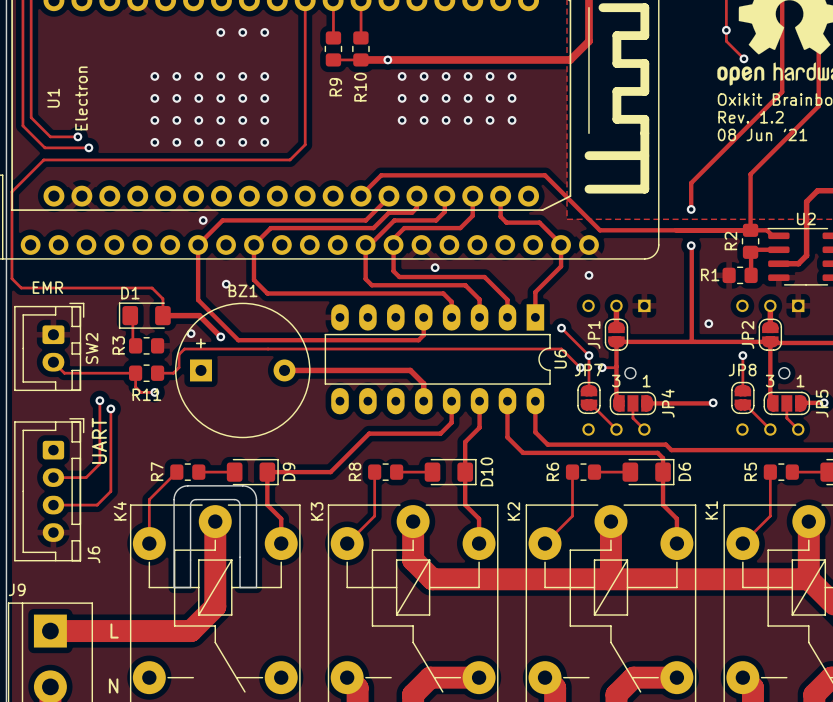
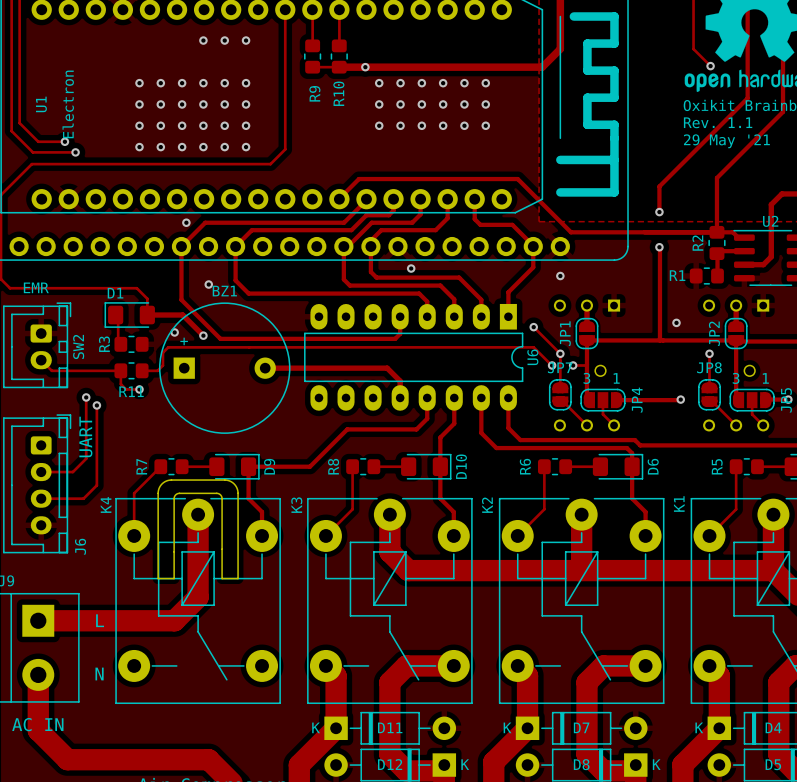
via: (726, 30) -> none
text: Rev. 1.2 (751, 117) -> Rev. 1.1 (718, 122)
text: 08 Jun '21 (762, 134) -> 29 May '21 (726, 141)

